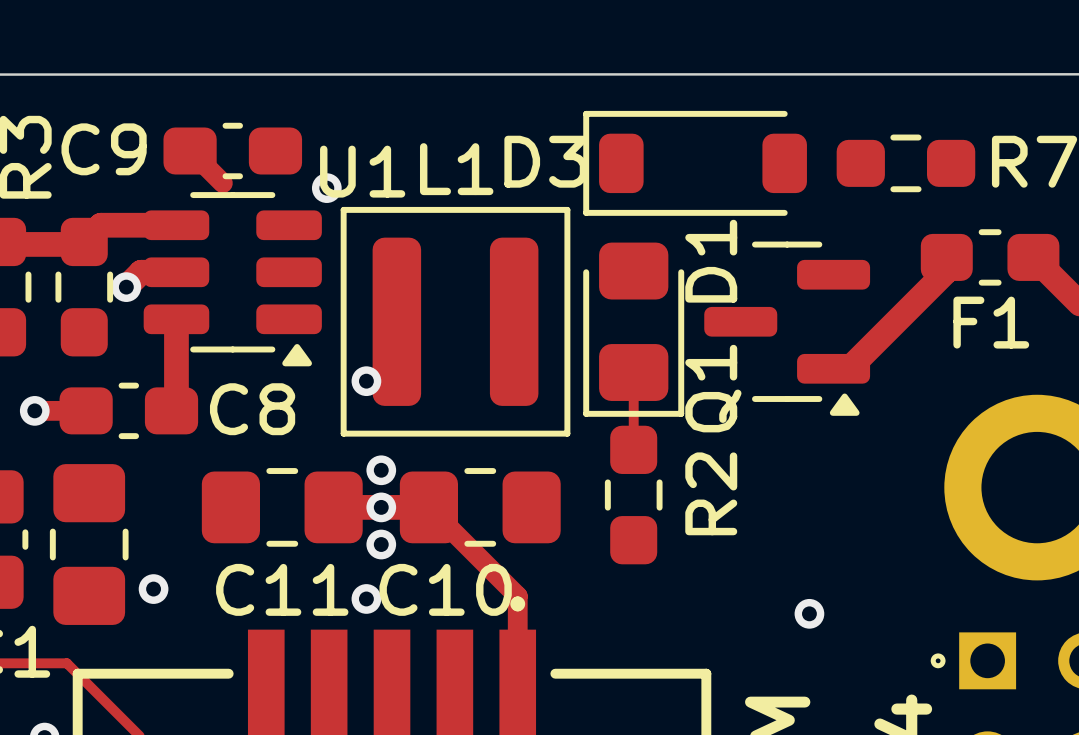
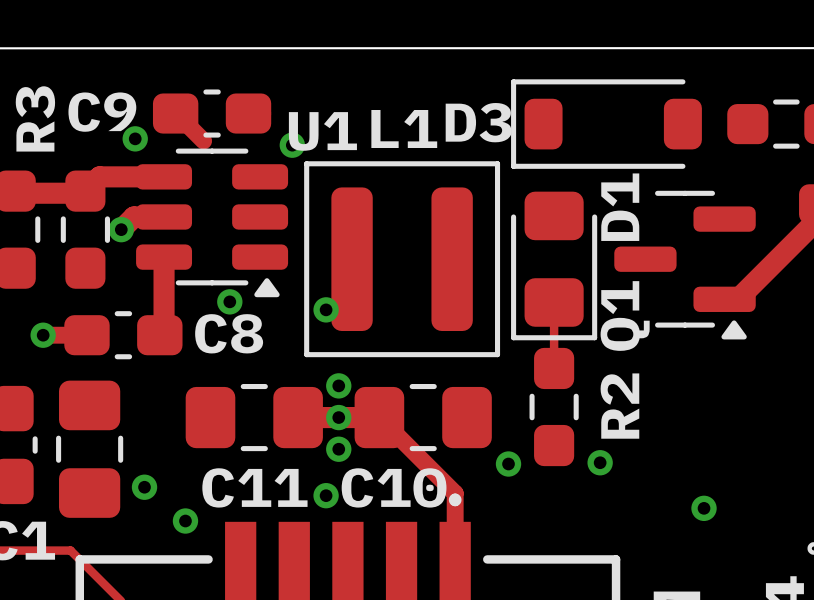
via: none -> (135, 138)
via: none -> (229, 301)
via: none -> (600, 462)
via: none -> (508, 464)
via: none -> (185, 521)

